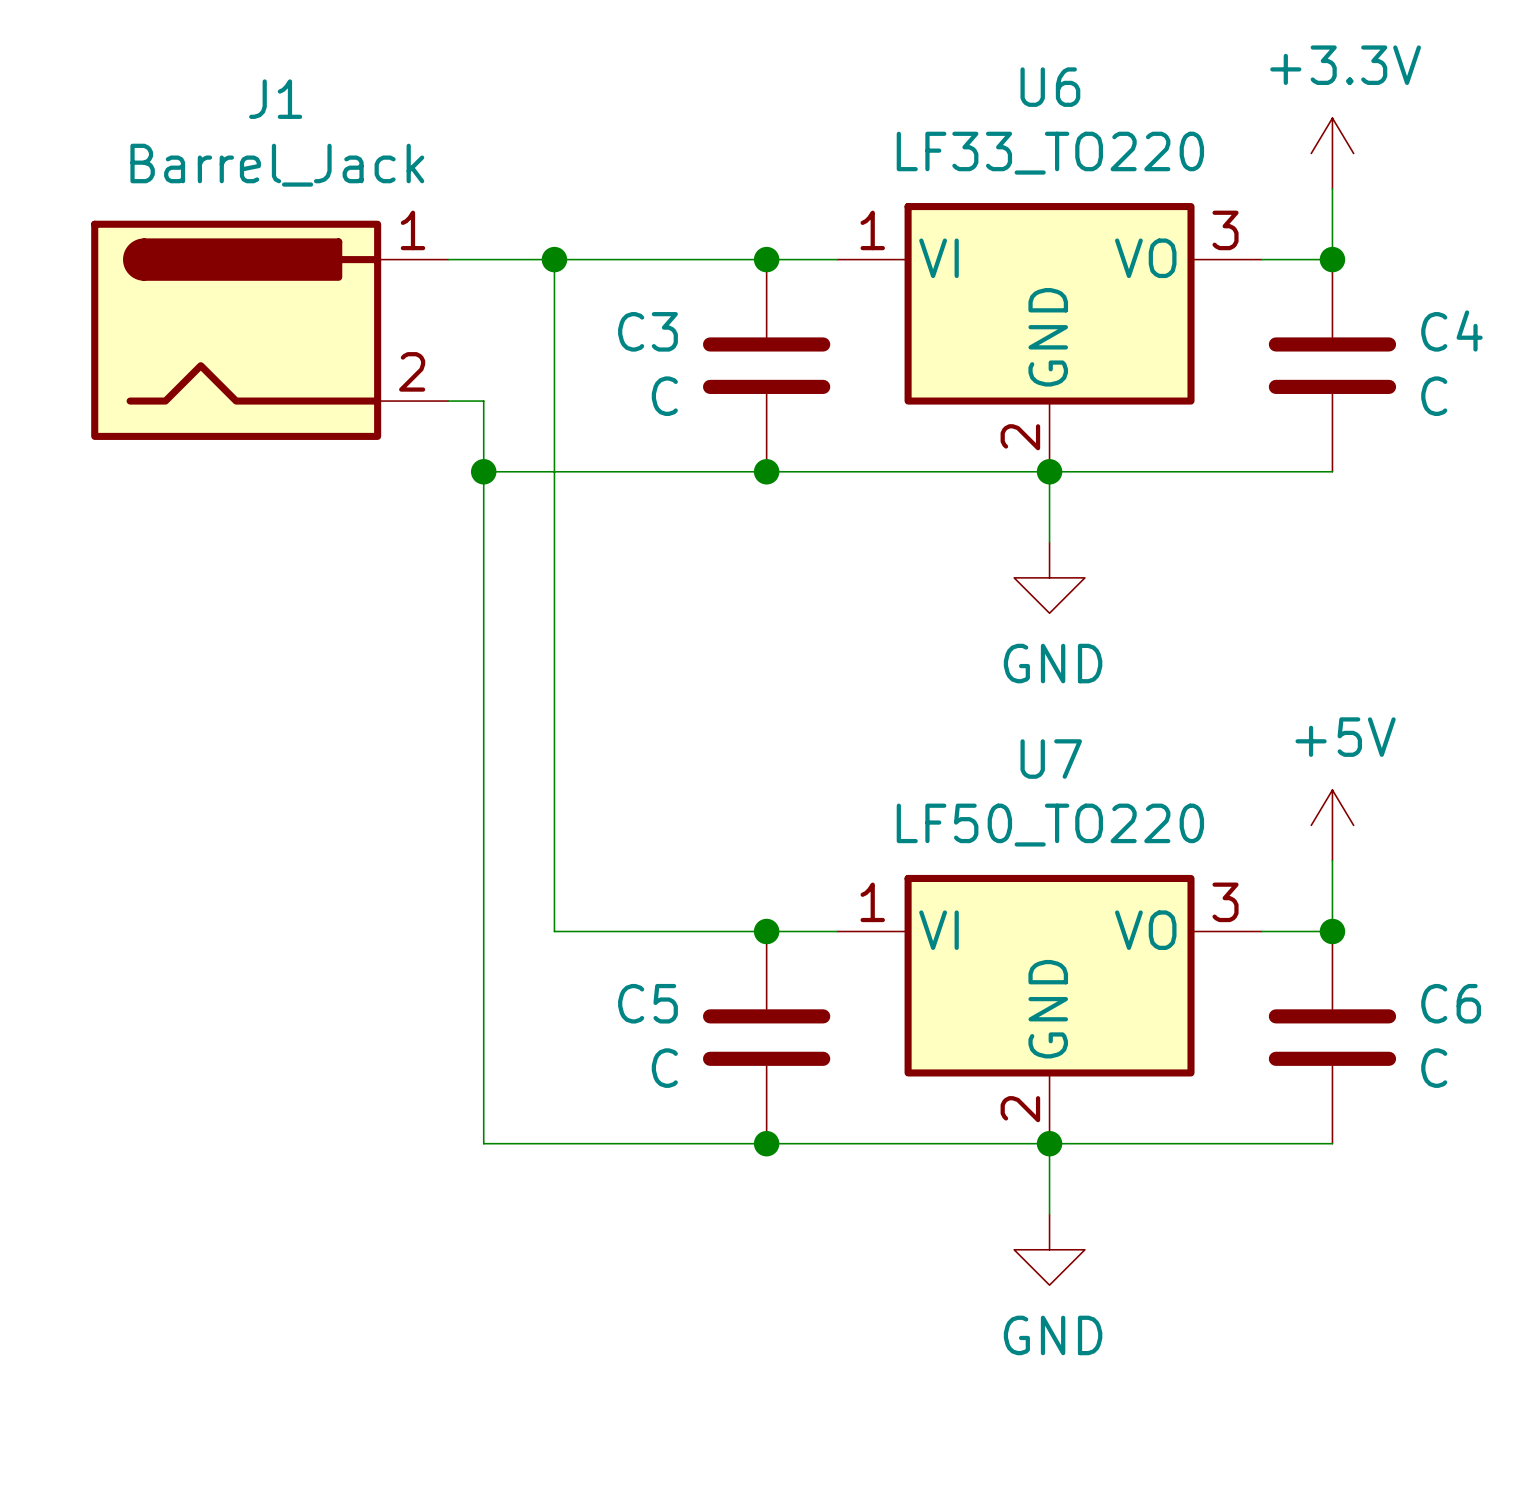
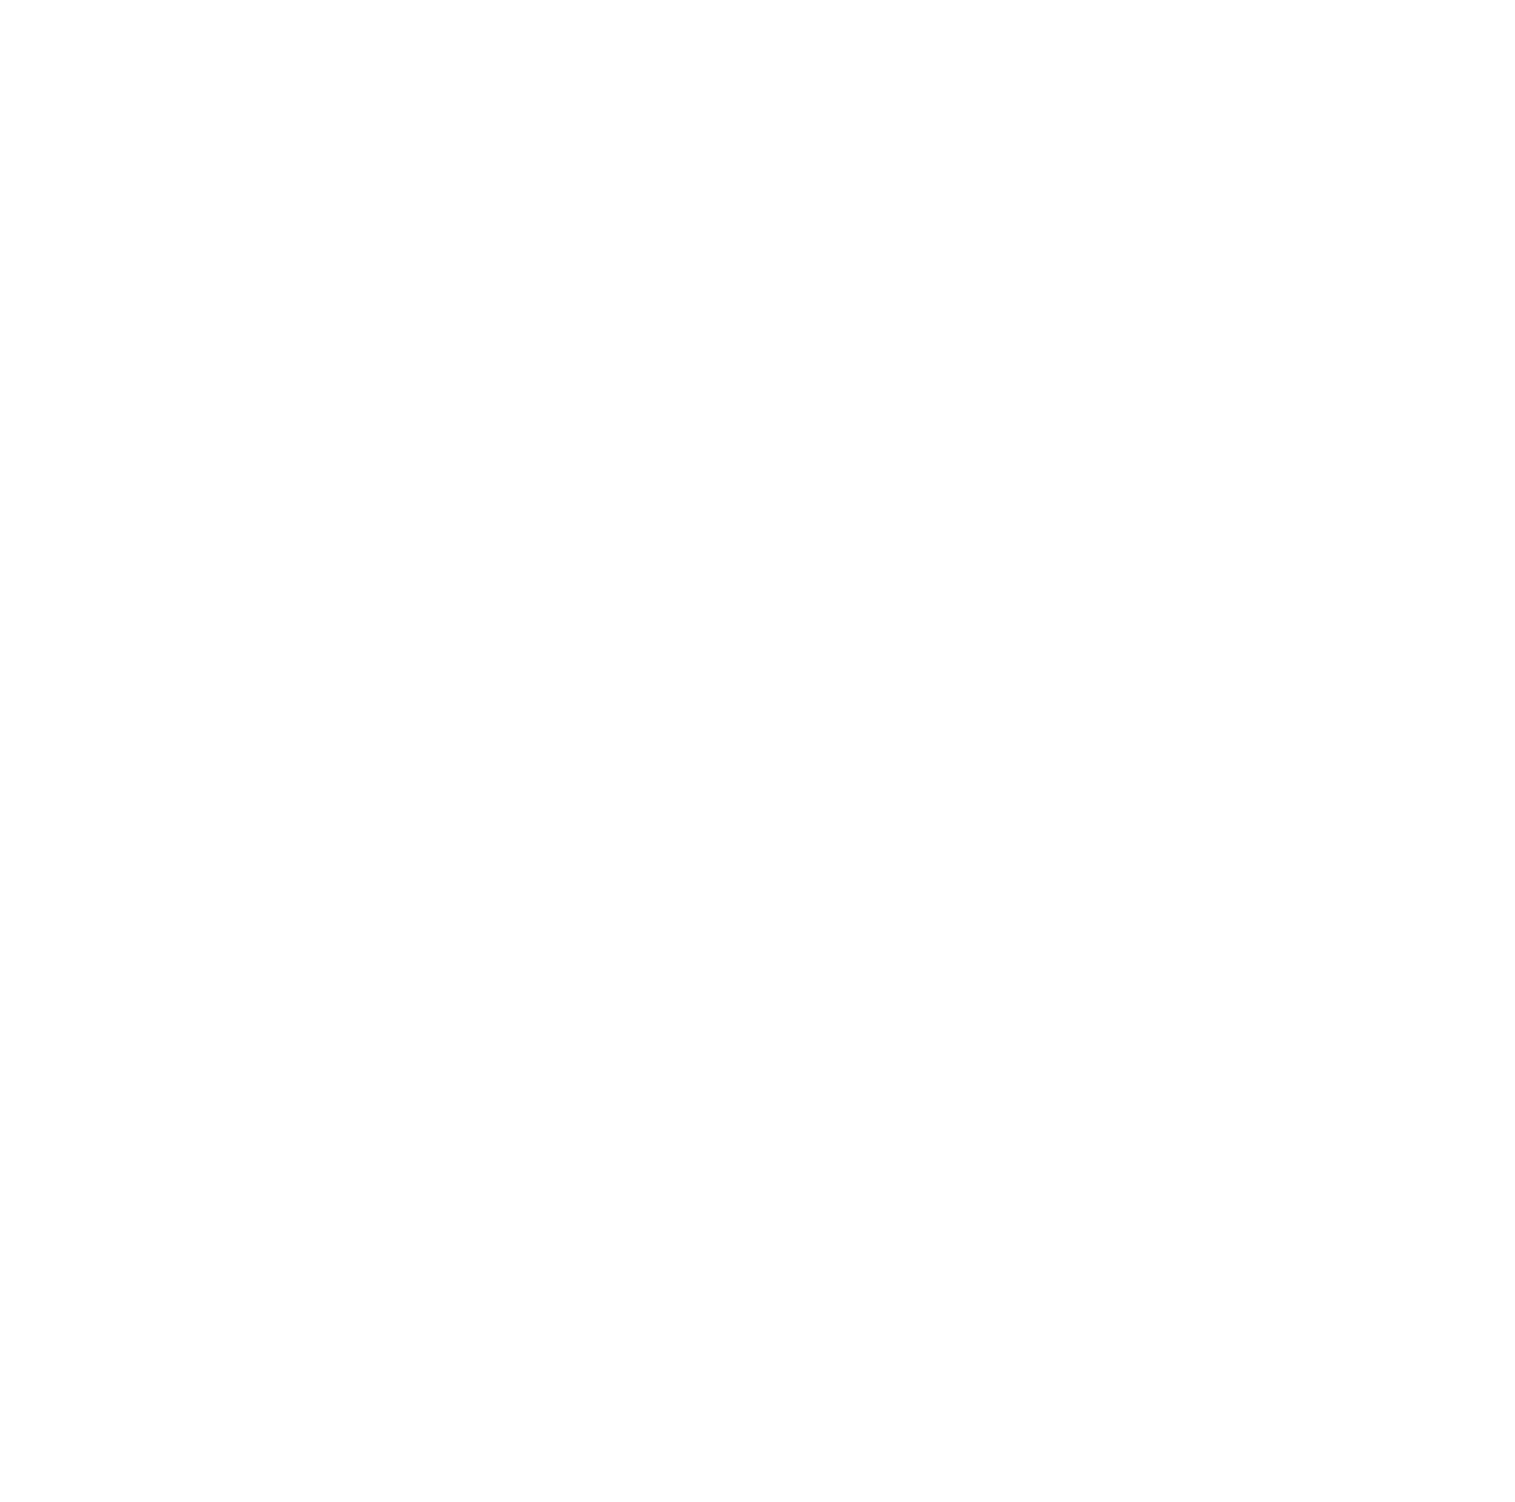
power symbol: +3.3V (1332, 153) -> none
wire: (1332, 188) (1332, 259) (1261, 259) -> none
wire: (448, 259) (837, 259) -> none
wire: (554, 259) (554, 931) (837, 931) -> none
junction: (554, 259) -> none
junction: (766, 259) -> none
junction: (1332, 259) -> none
J1: Barrel_Jack (269, 330) -> none
U6: LF33_TO220 (1049, 337) -> none
C3: C (766, 365) -> none
C4: C (1332, 365) -> none
wire: (448, 401) (483, 401) (483, 1143) (1332, 1143) -> none
wire: (483, 471) (1332, 471) -> none
junction: (483, 471) -> none
junction: (766, 471) -> none
wire: (1049, 471) (1049, 542) -> none
junction: (1049, 471) -> none
power symbol: GND (1049, 577) -> none
power symbol: +5V (1332, 825) -> none
wire: (1332, 860) (1332, 931) (1261, 931) -> none
junction: (766, 931) -> none
junction: (1332, 931) -> none
U7: LF50_TO220 (1049, 1009) -> none
C5: C (766, 1037) -> none
C6: C (1332, 1037) -> none
junction: (766, 1143) -> none
wire: (1049, 1143) (1049, 1214) -> none
junction: (1049, 1143) -> none
power symbol: GND (1049, 1249) -> none

